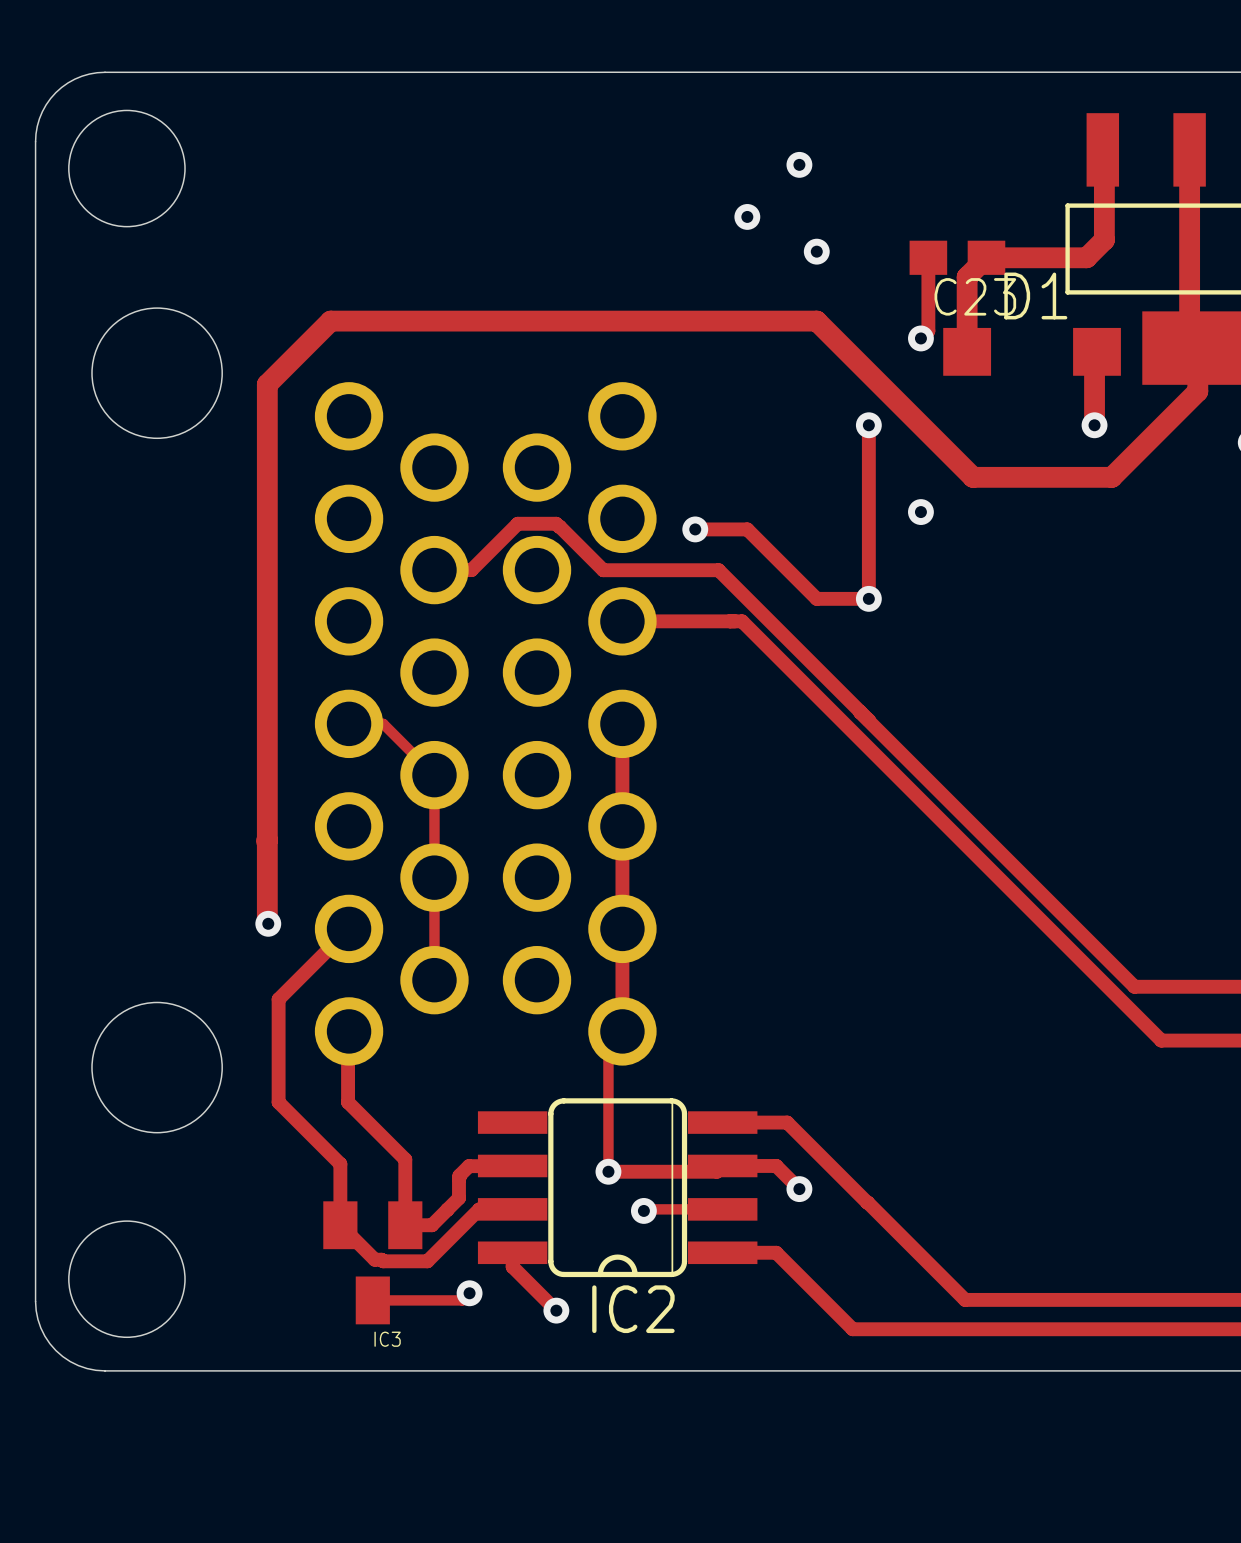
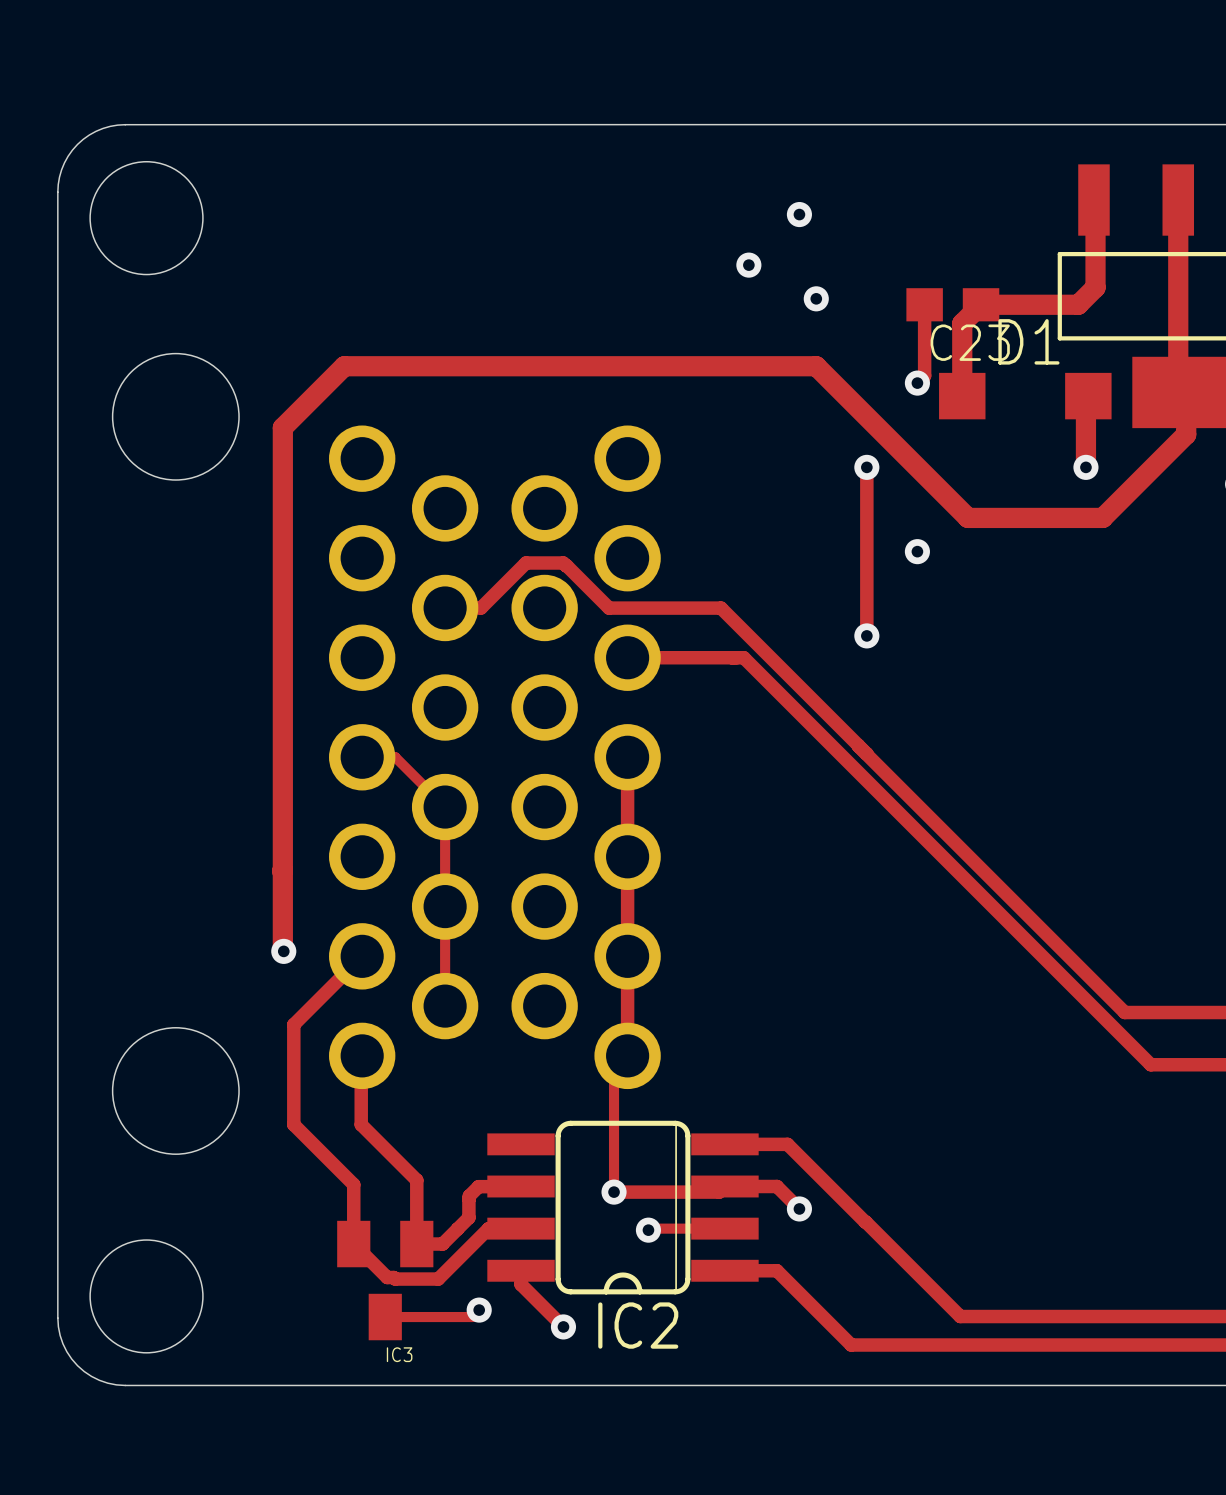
track: (695, 529) (747, 529) (816, 598) (868, 598) -> none
via: (695, 529) -> none

